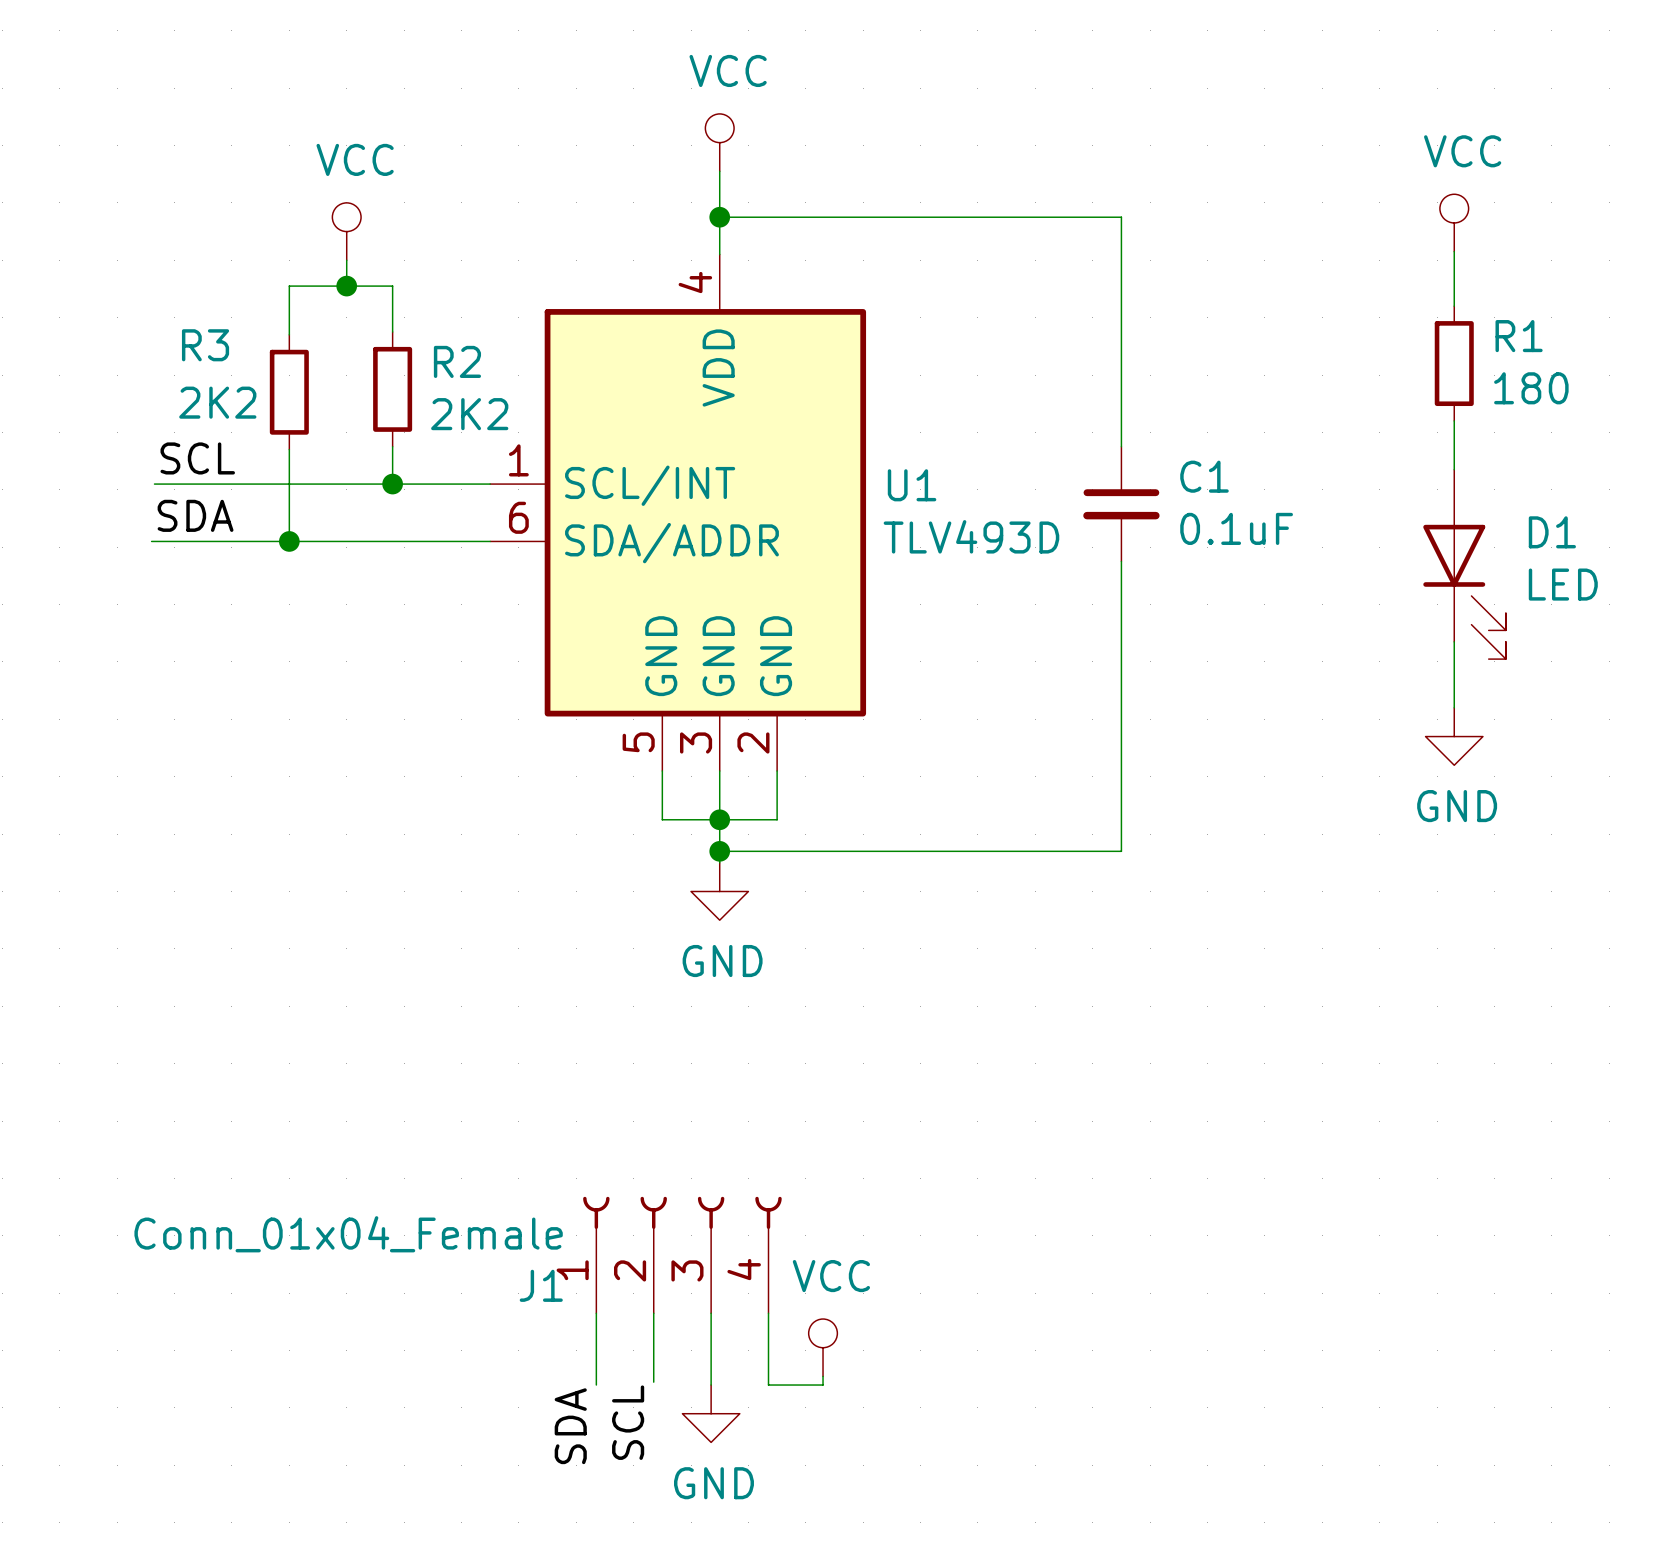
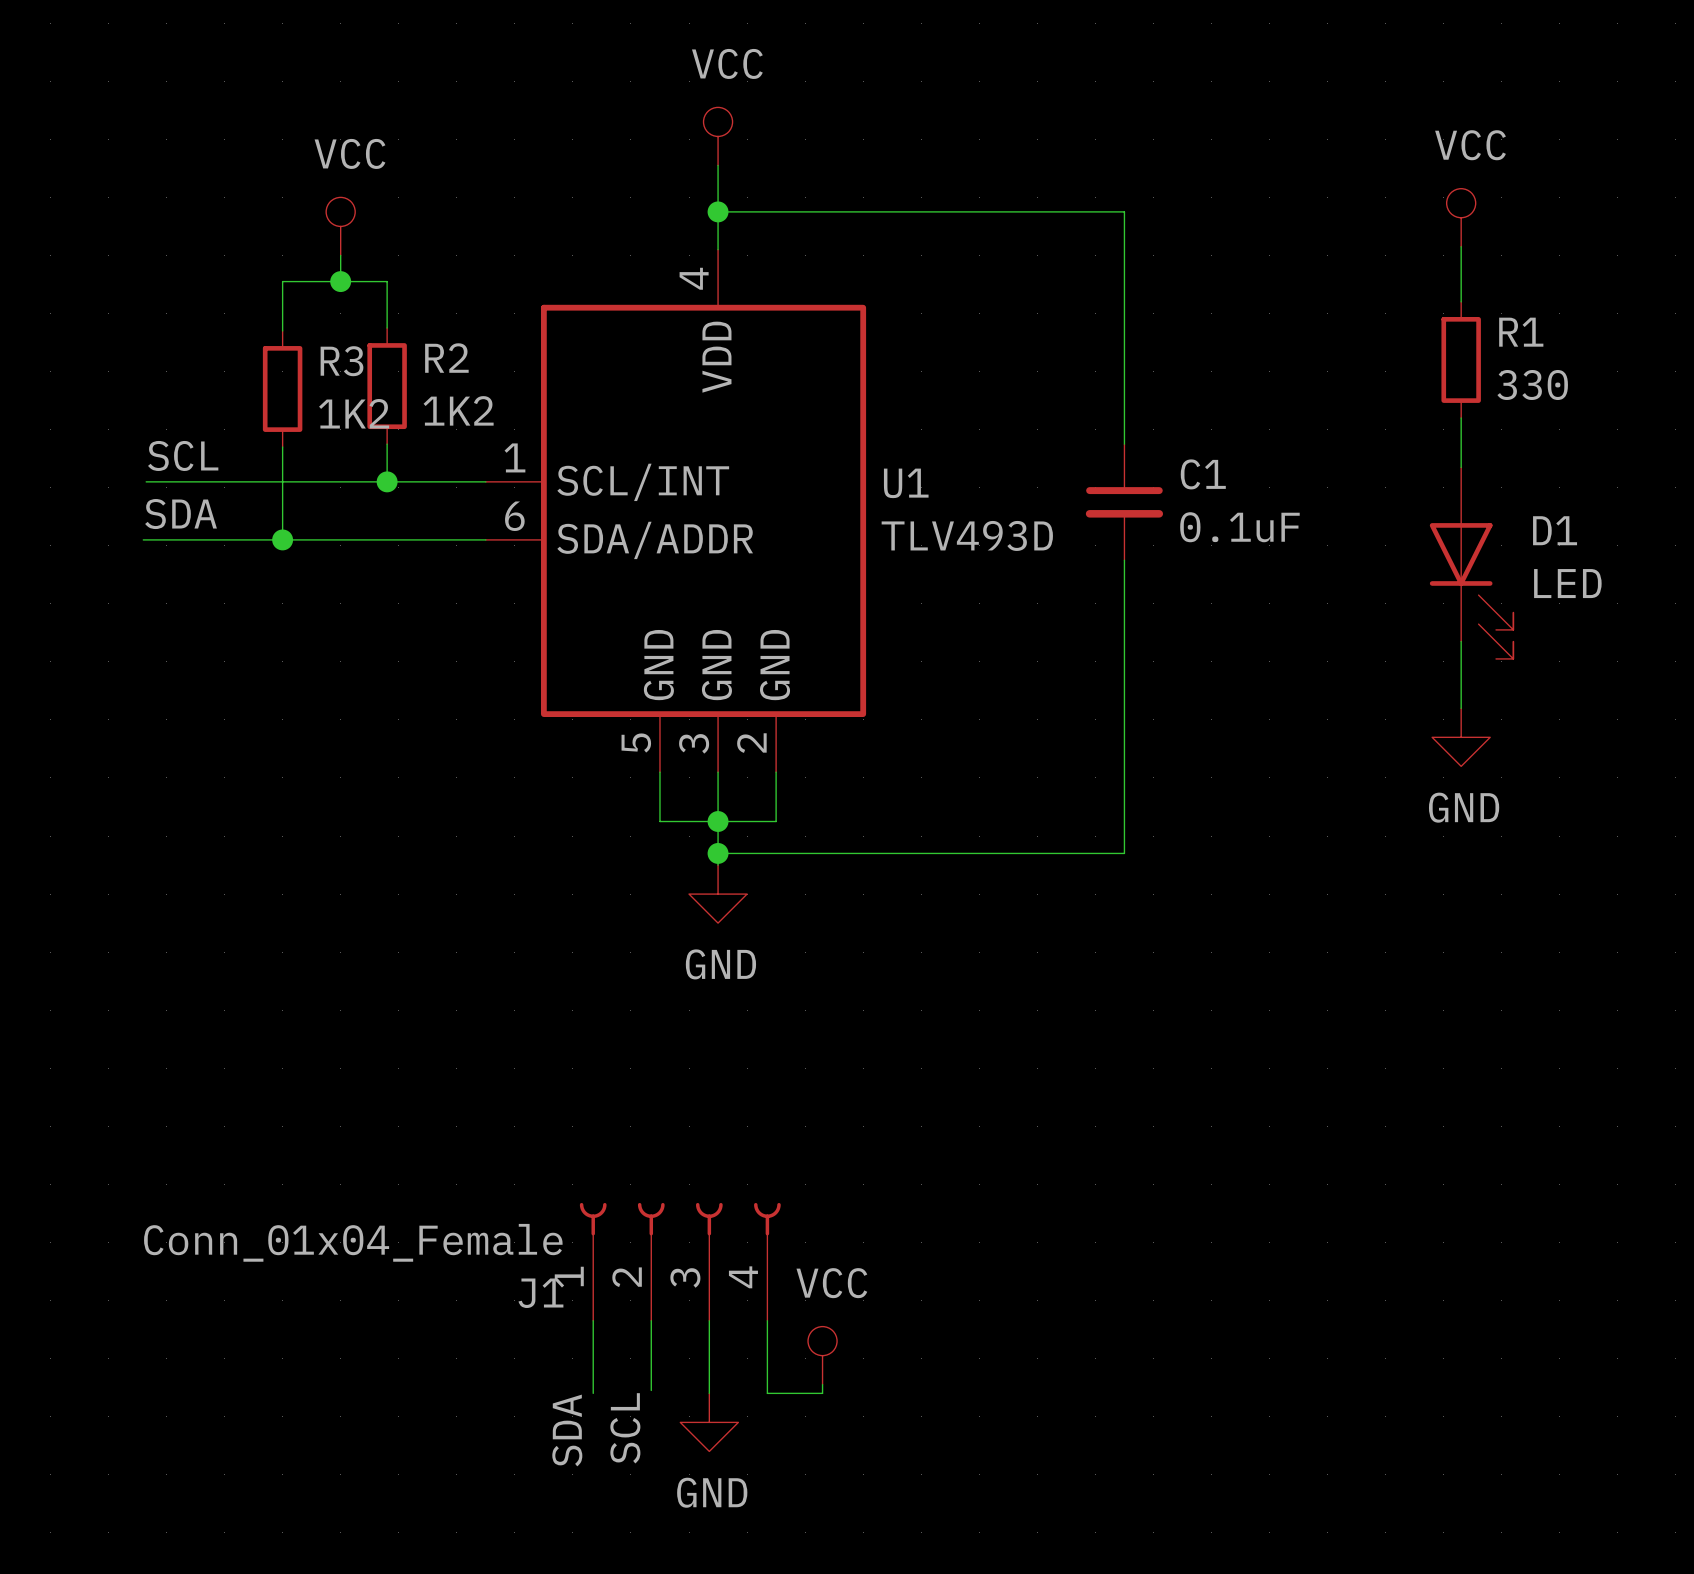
R3 name position: R3 (205, 345) -> R3 (341, 361)
R1 value: 180 (1531, 388) -> 330 (1532, 385)
R3 value: 2K2 (217, 402) -> 1K2 (354, 413)
R2 value: 2K2 (469, 414) -> 1K2 (458, 410)

